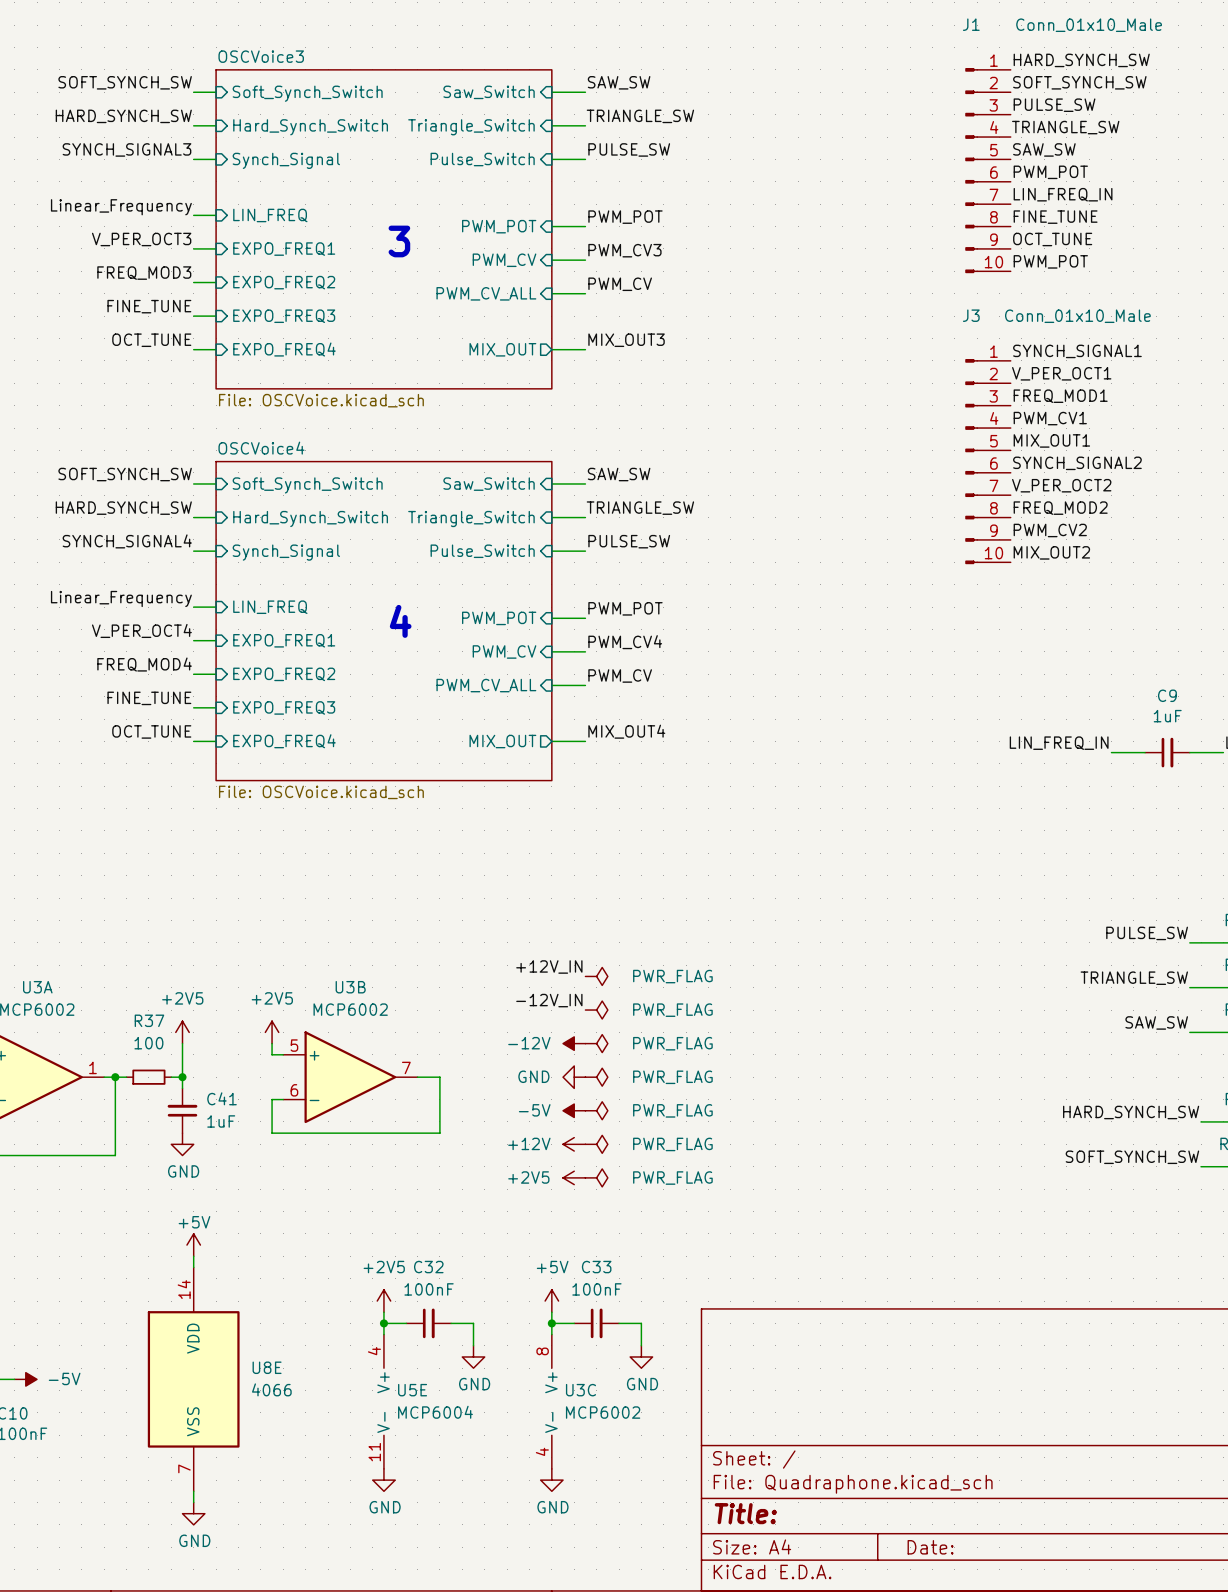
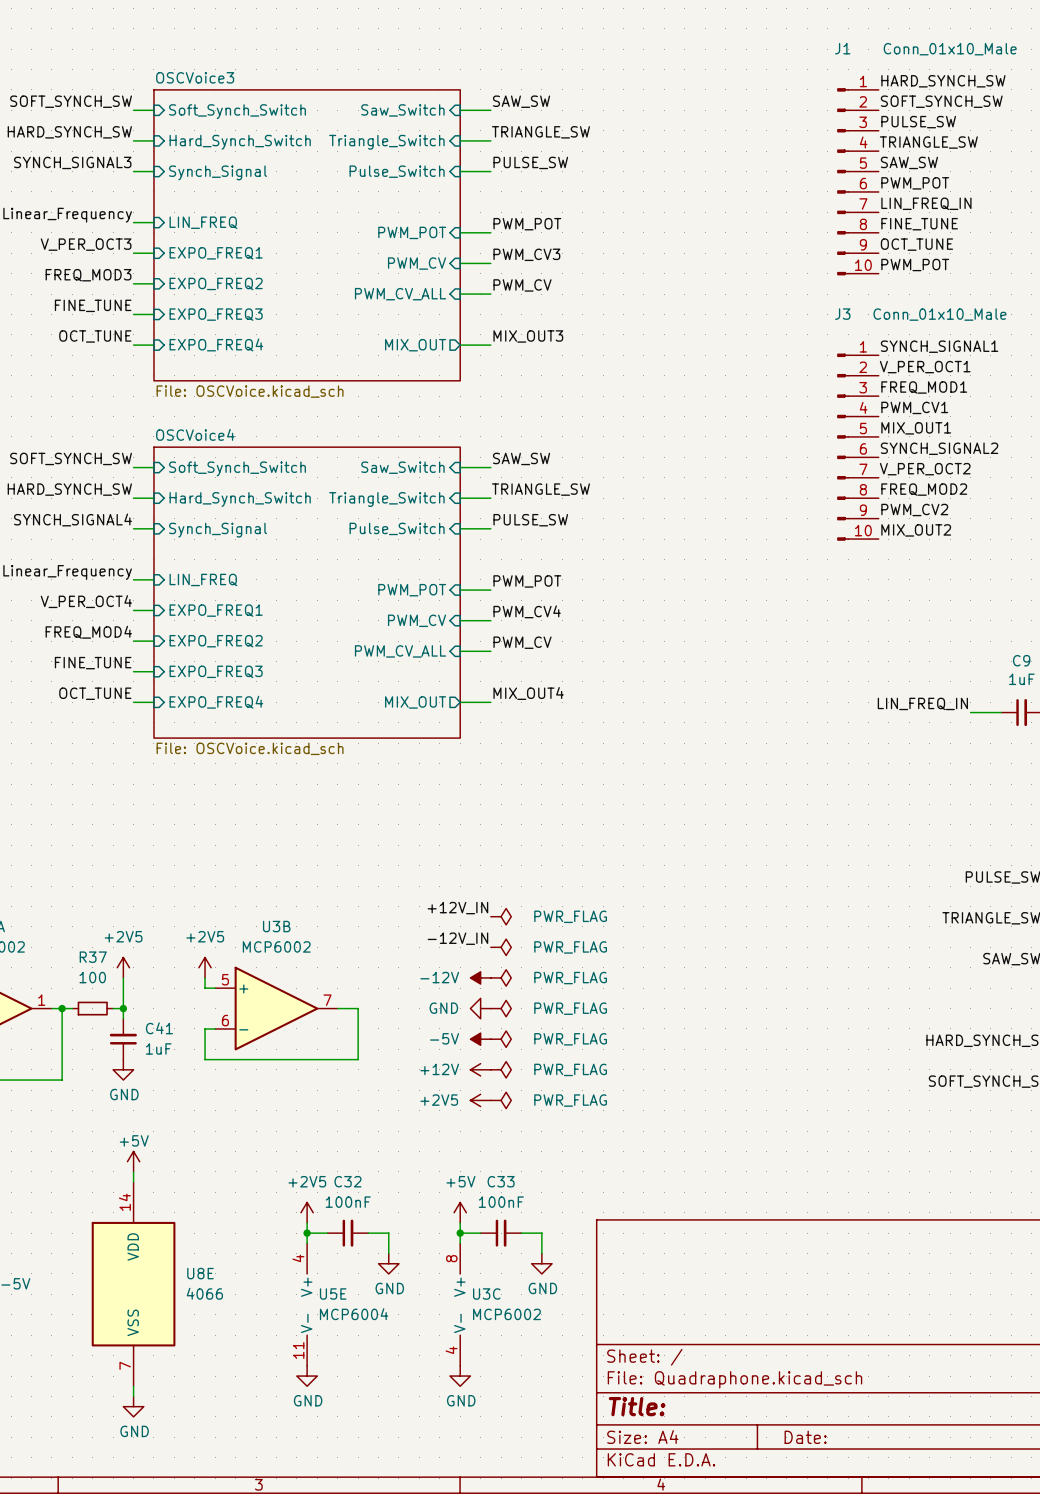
text: 3 (399, 241) -> none
text: 4 (400, 621) -> none

